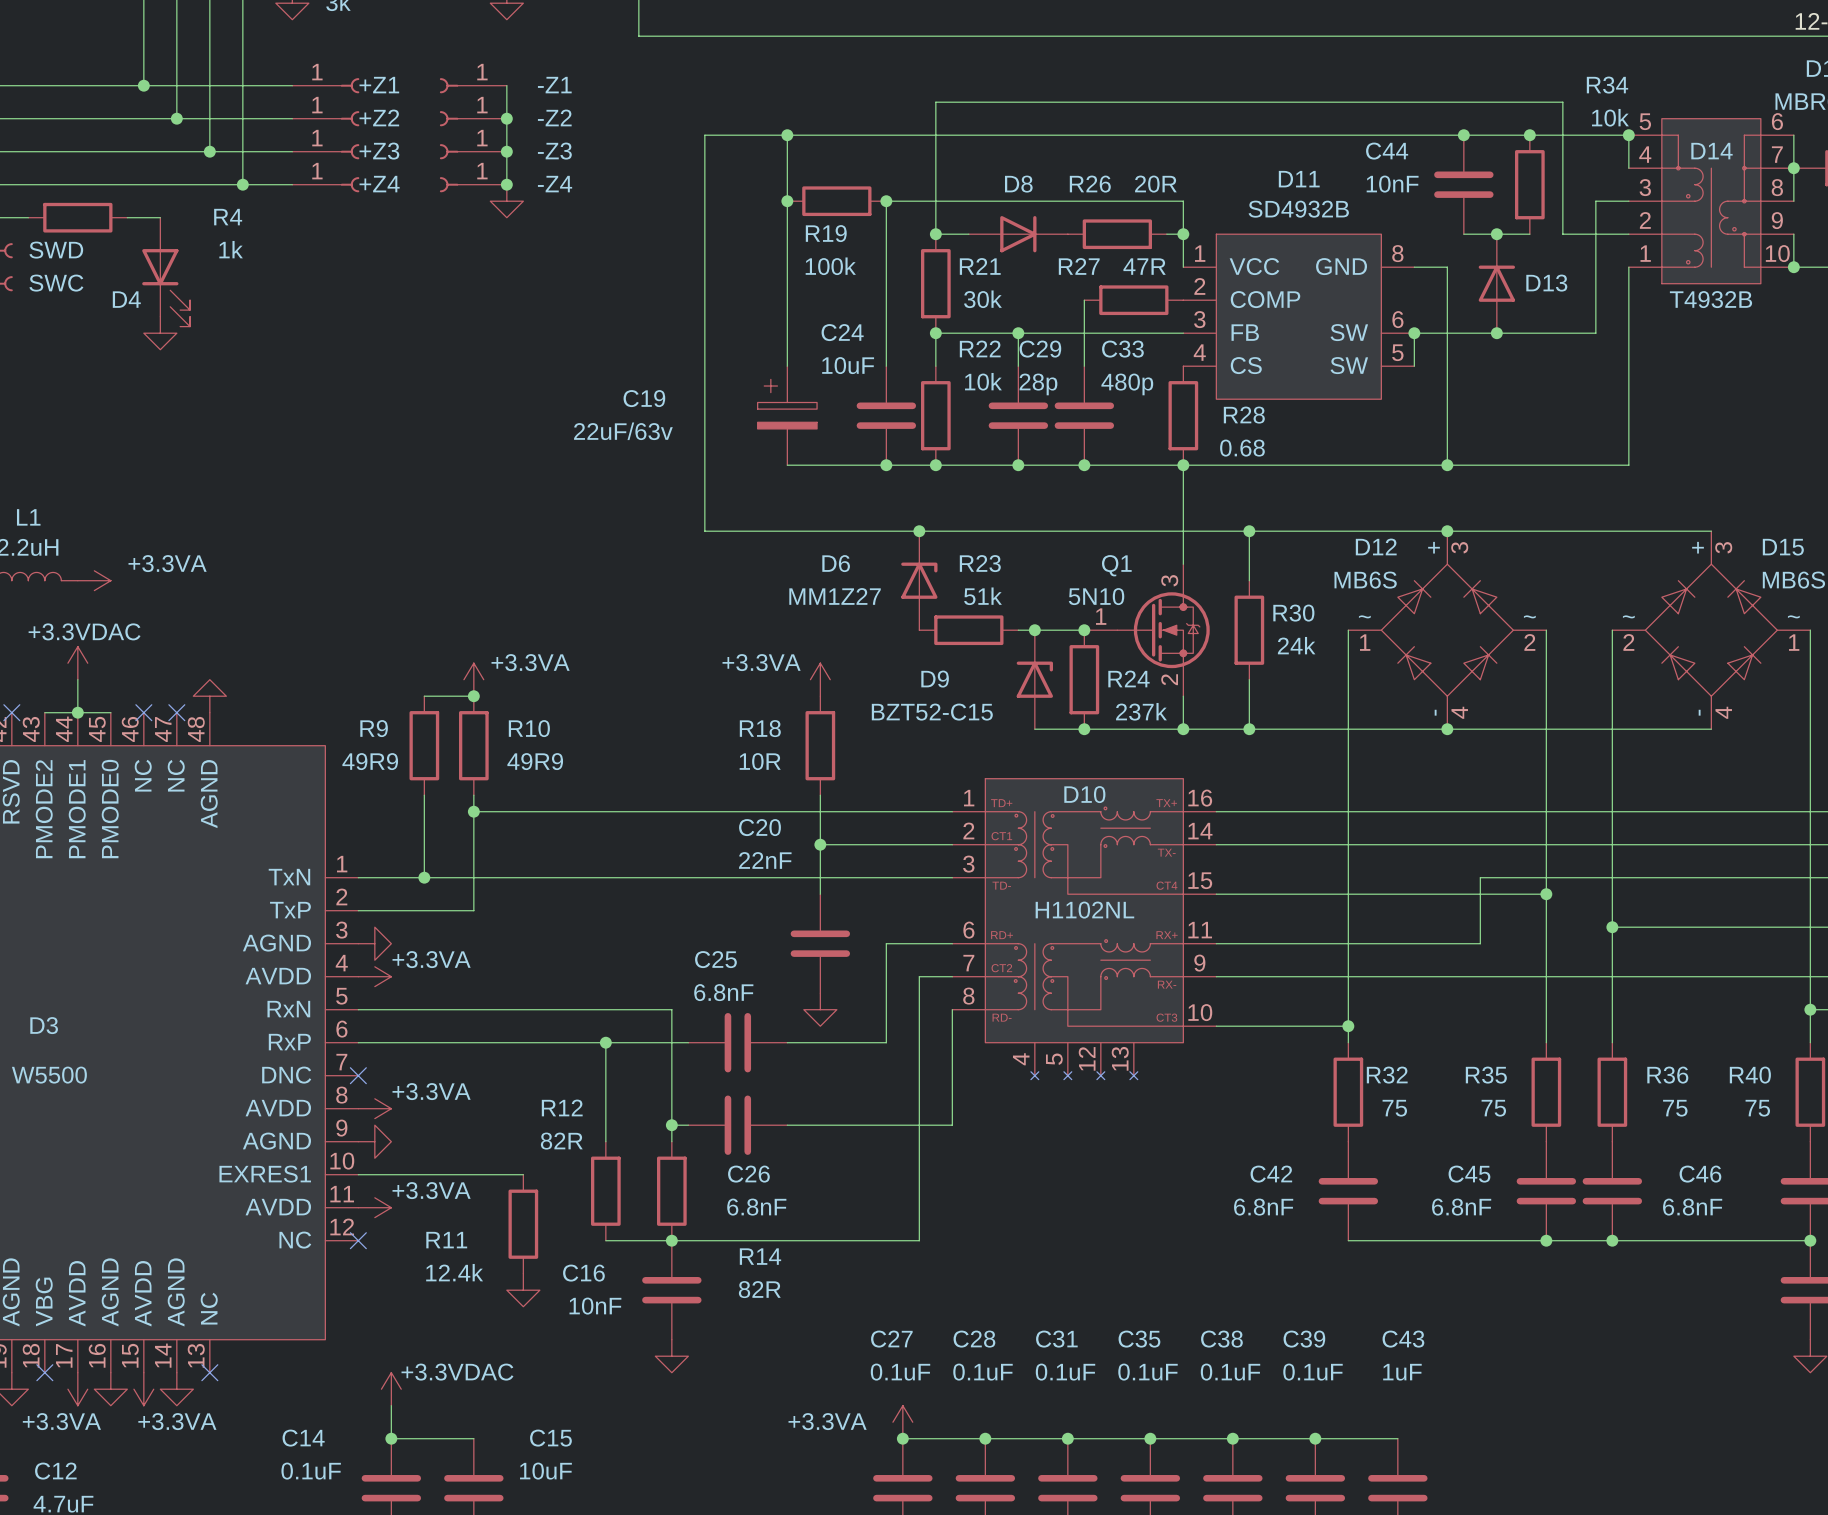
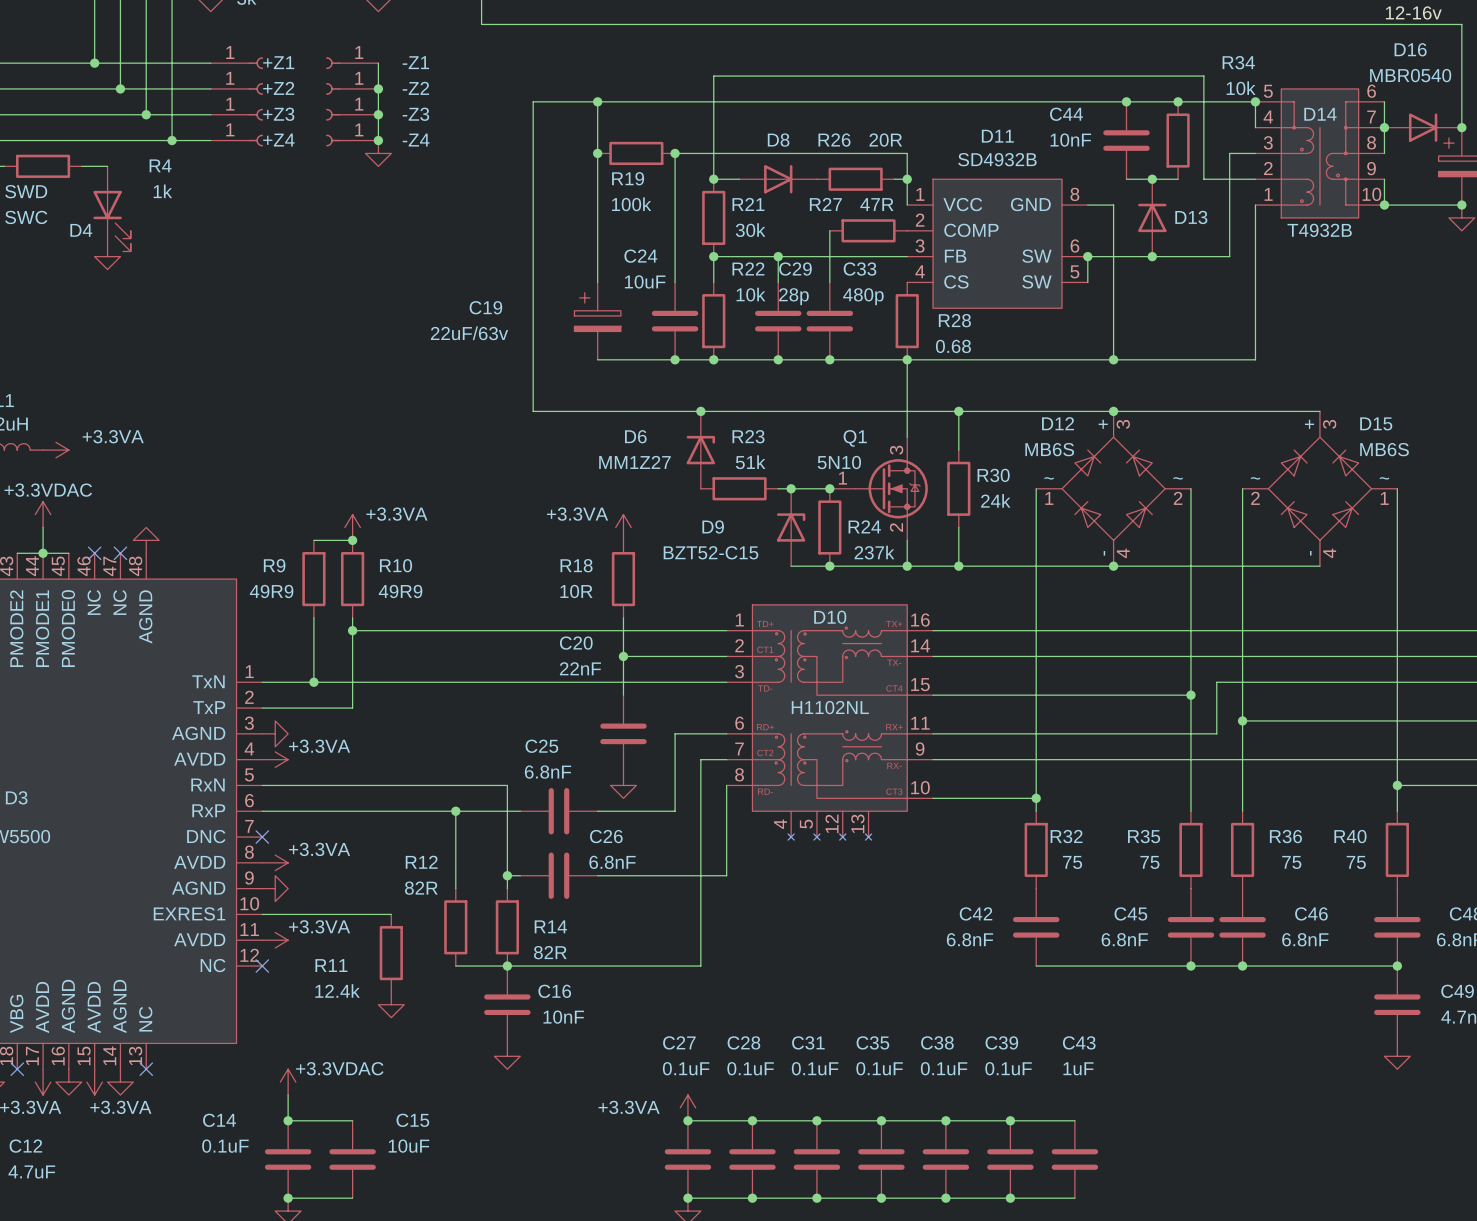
wire: (1579, 877) (1480, 877) (1480, 943) -> (1216, 682) (1216, 733) (1139, 733)
C26 name position: C26 (748, 1174) -> C26 (606, 836)
C26 value position: 6.8nF (756, 1207) -> 6.8nF (612, 862)
R14 name position: R14 (760, 1256) -> R14 (550, 926)
C16 name position: C16 (583, 1273) -> C16 (554, 991)
R14 value position: 82R (759, 1289) -> 82R (550, 952)
C16 value position: 10nF (595, 1306) -> 10nF (563, 1017)

